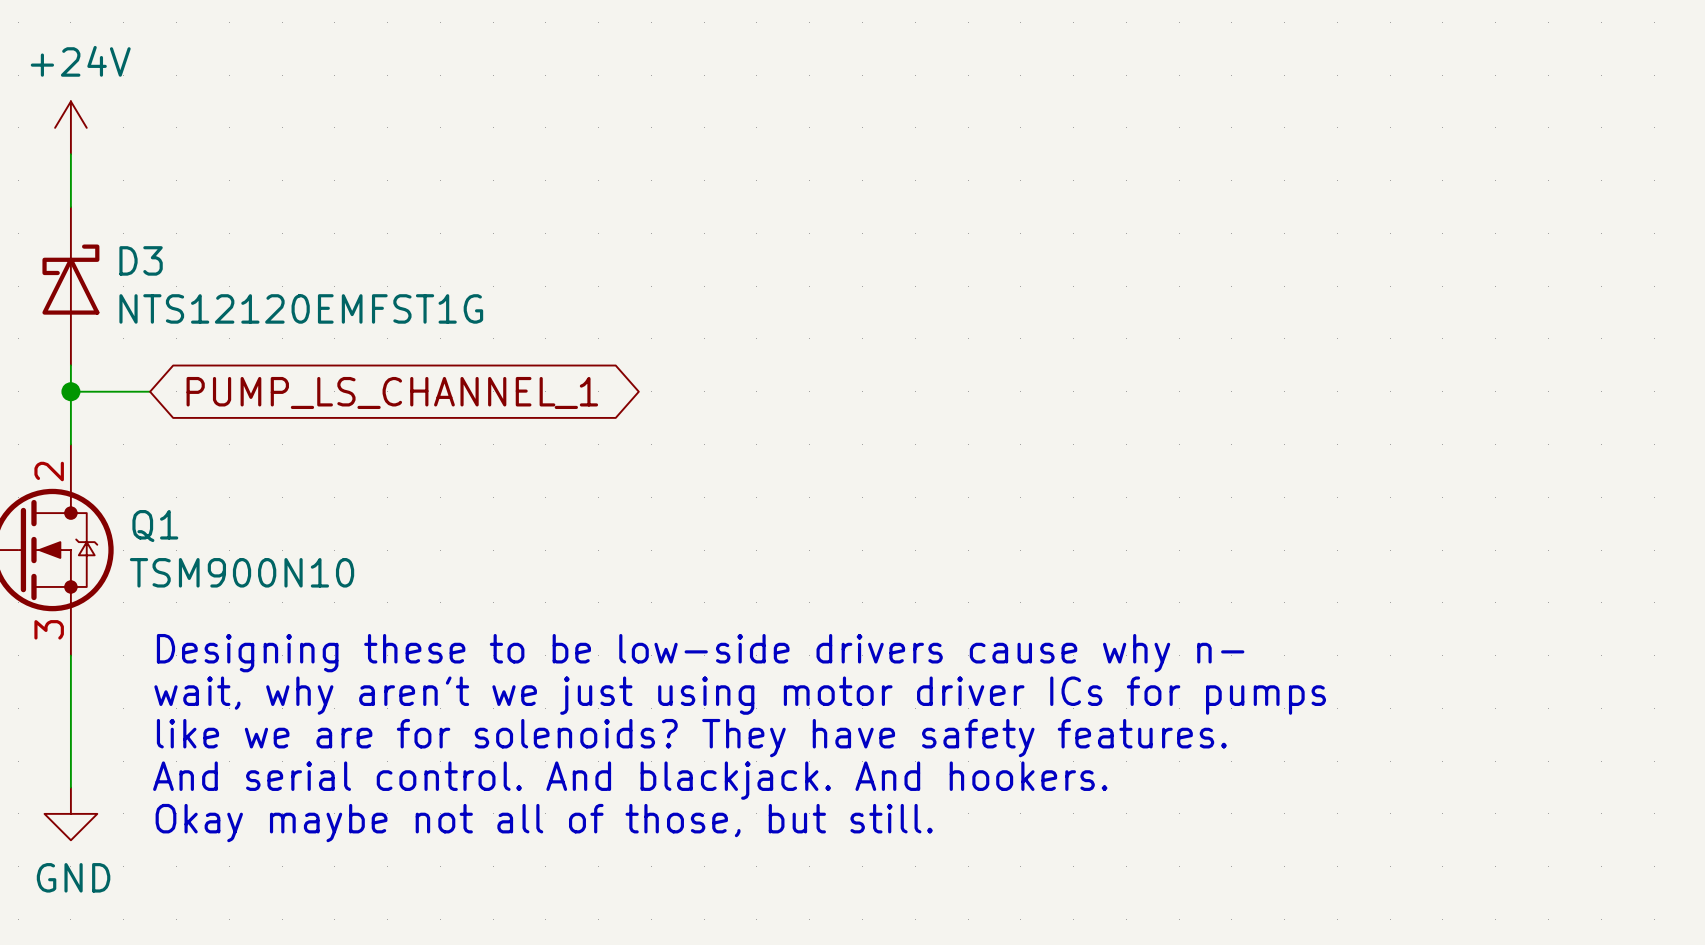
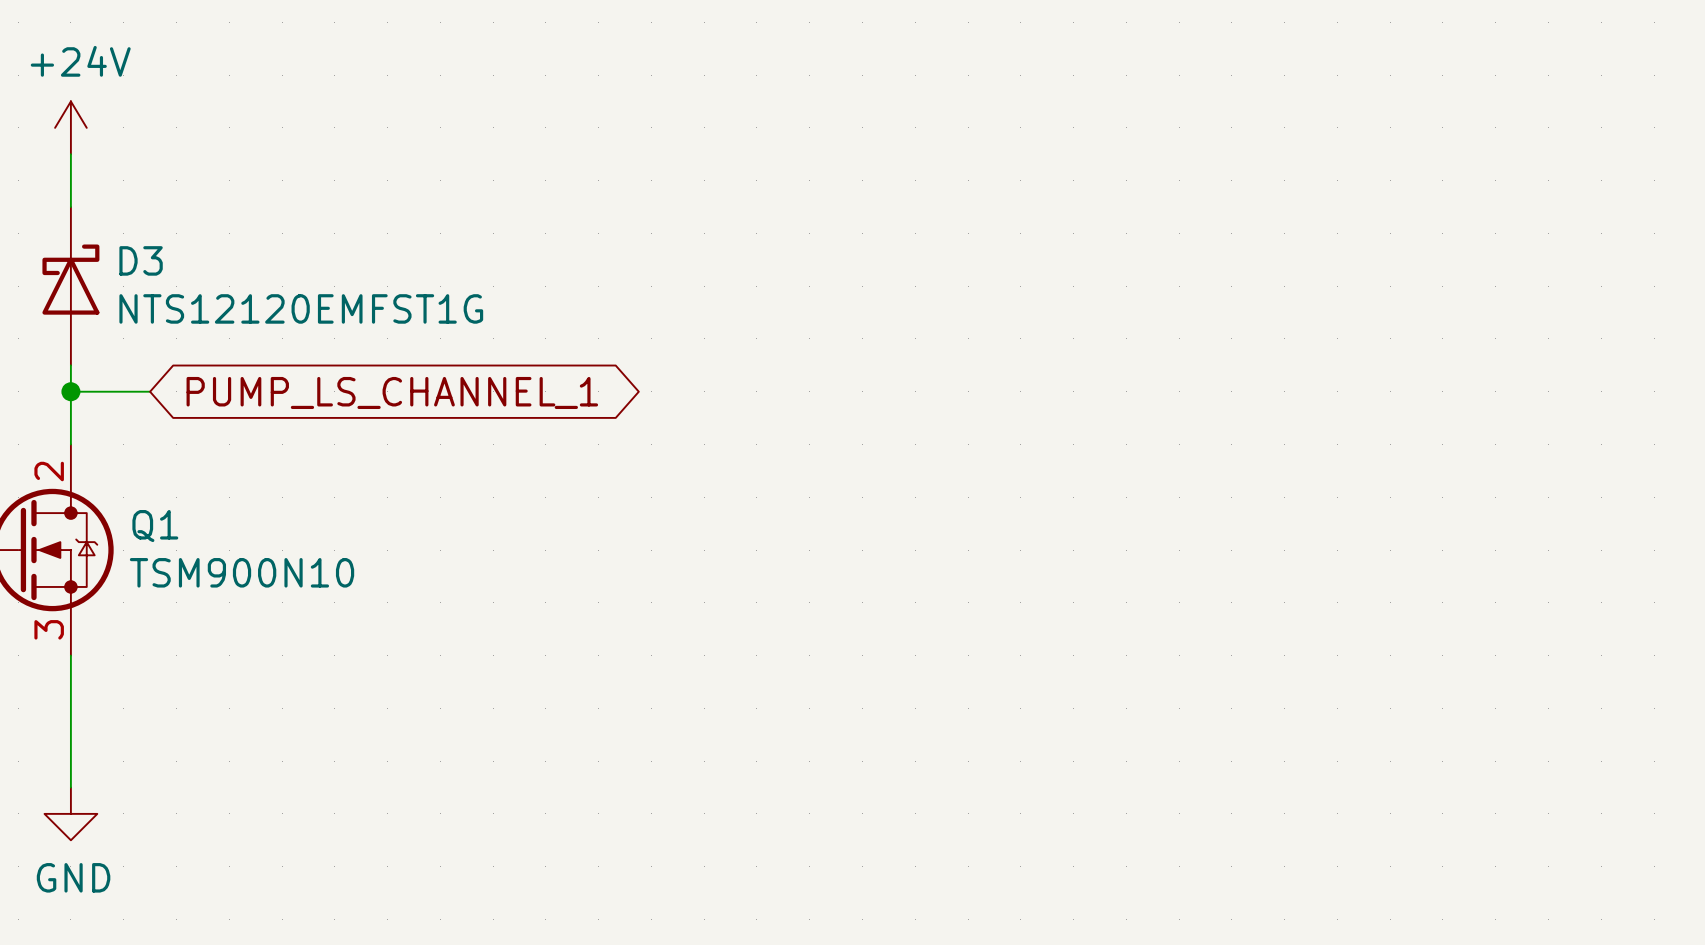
text: Designing these to be low-side drivers cause why n- (700, 653) -> none
text: wait, why aren't we just using motor driver ICs for pumps (740, 695) -> none
text: like we are for solenoids? They have safety features. (691, 738) -> none
text: And serial control. And blackjack. And hookers. (630, 780) -> none
text: Okay maybe not all of those, but still. (544, 823) -> none

